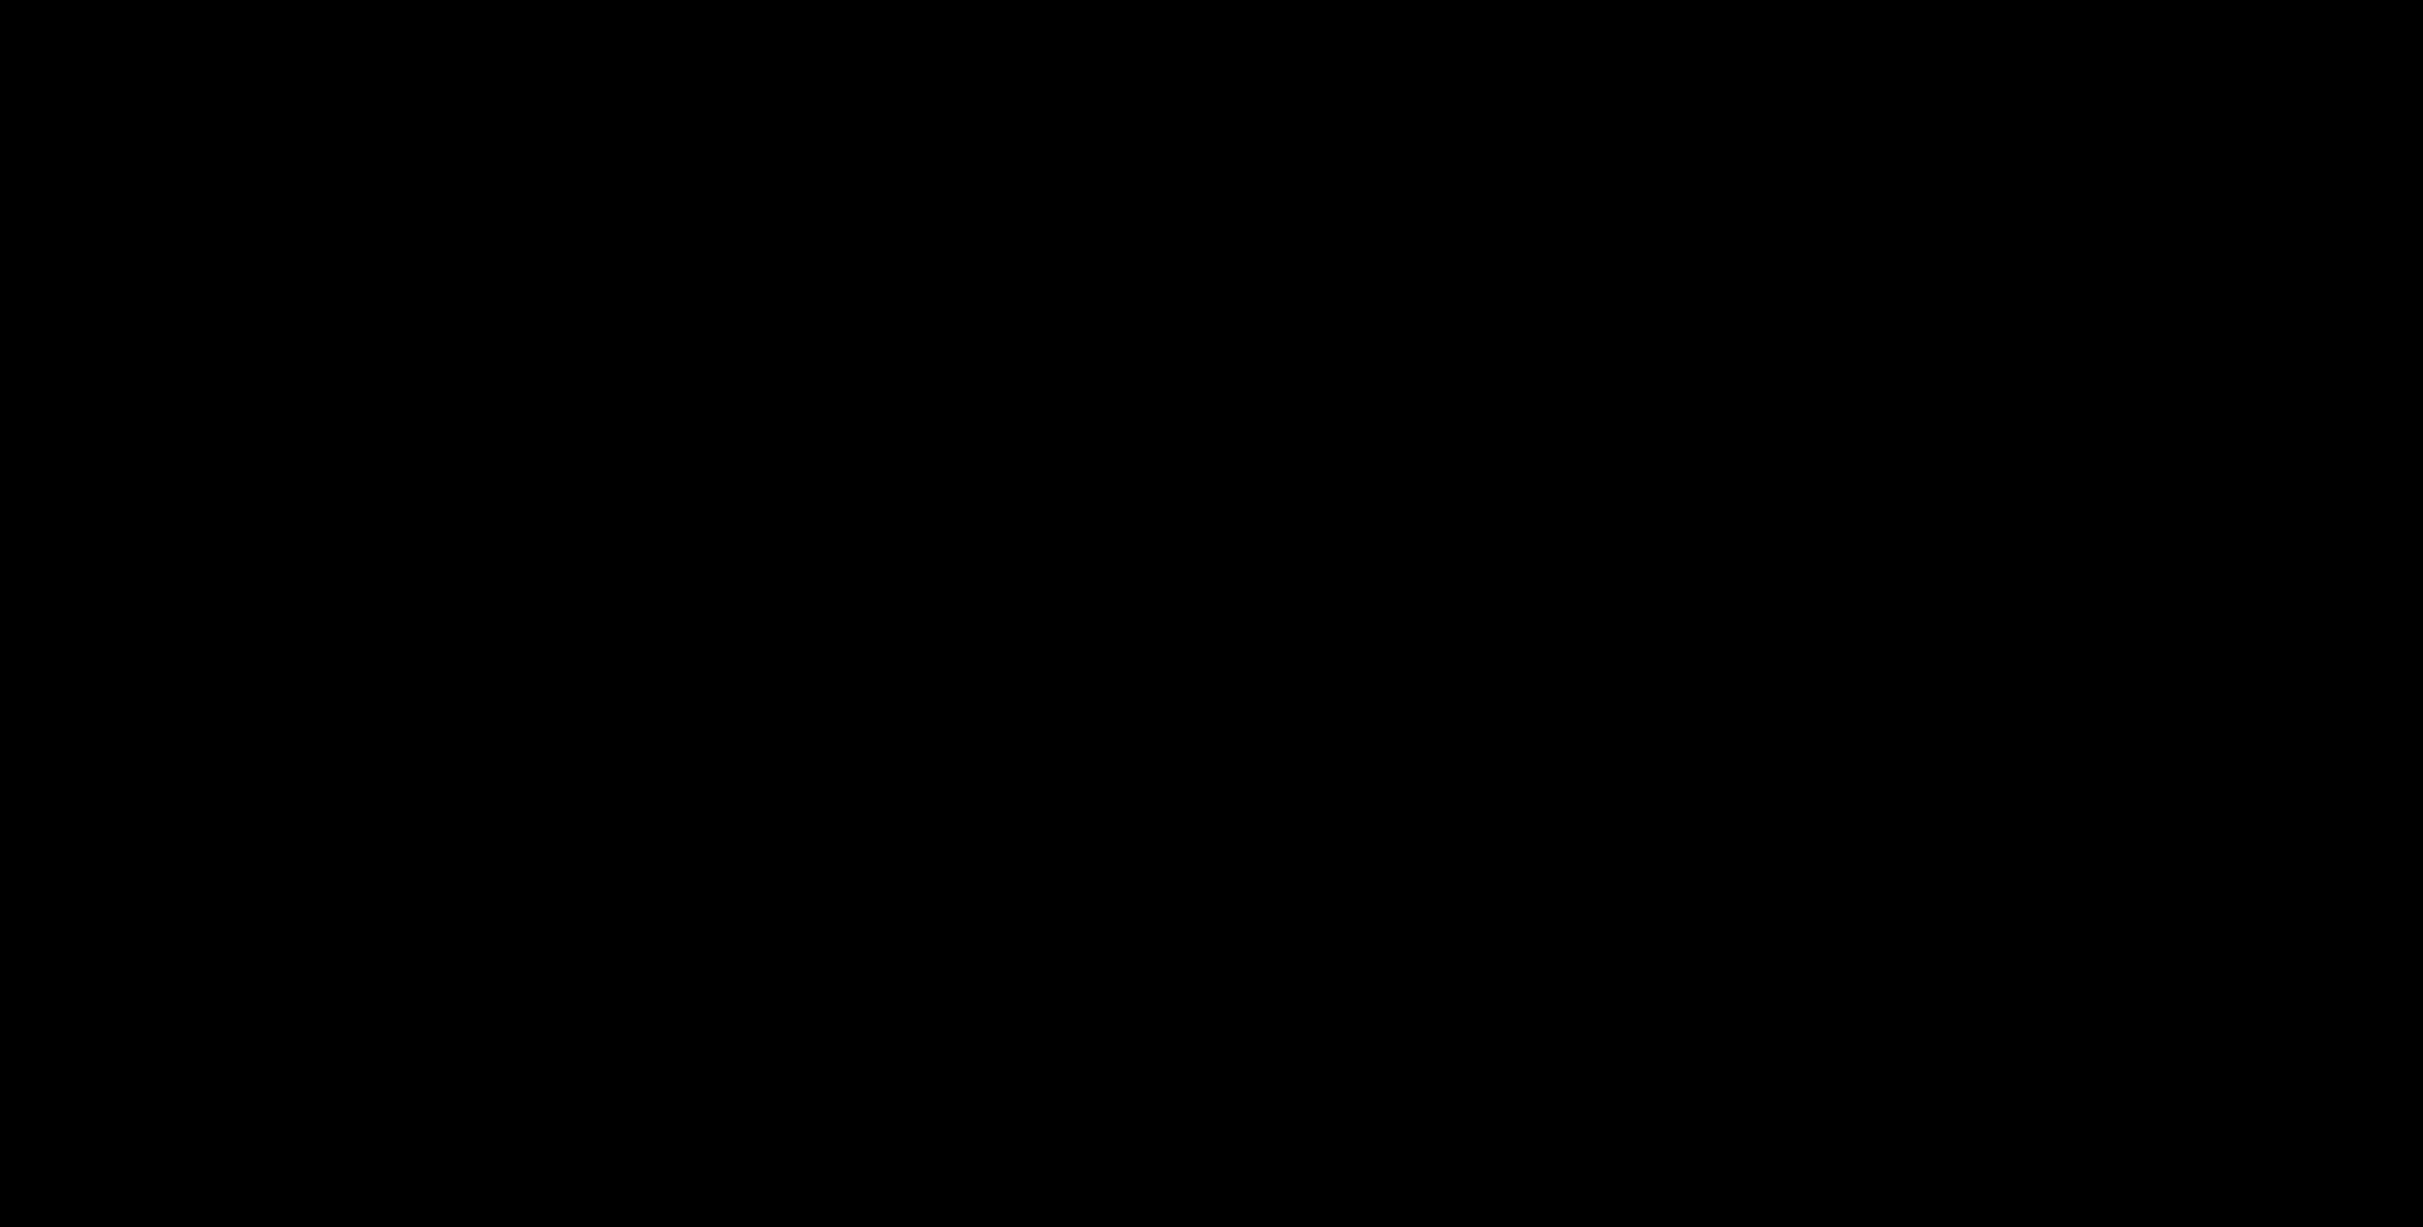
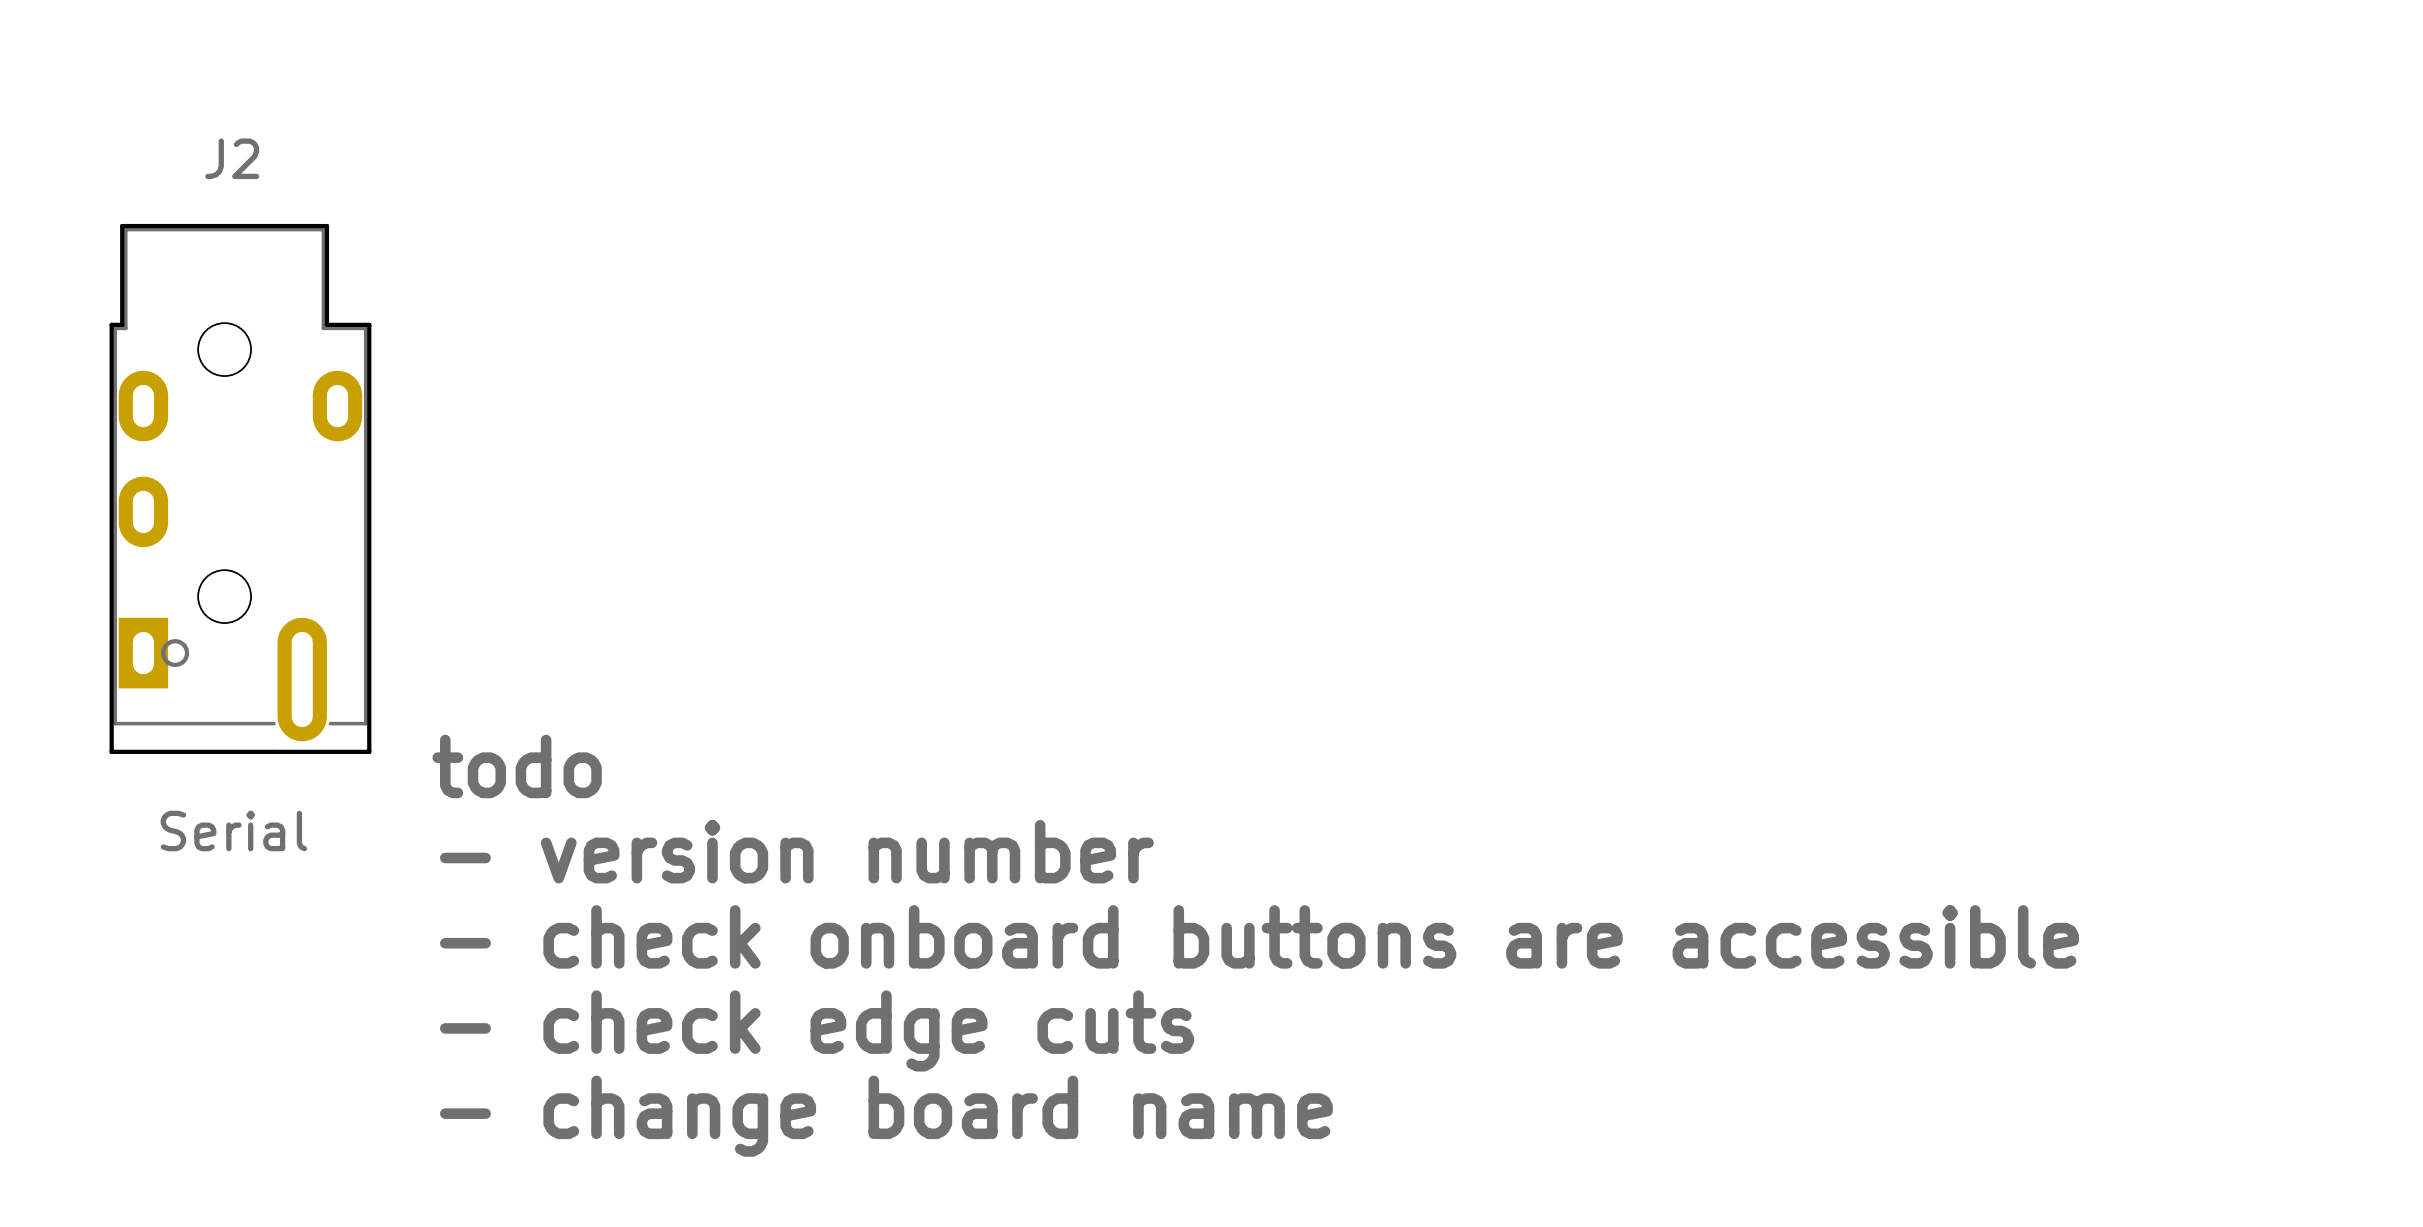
J2: none -> Serial (240, 488)
text: none -> todo (517, 766)
text: none -> - version number (796, 851)
text: none -> - check onboard buttons are accessible (1259, 936)
text: none -> - check edge cuts (817, 1030)
text: none -> - change board name (886, 1116)

